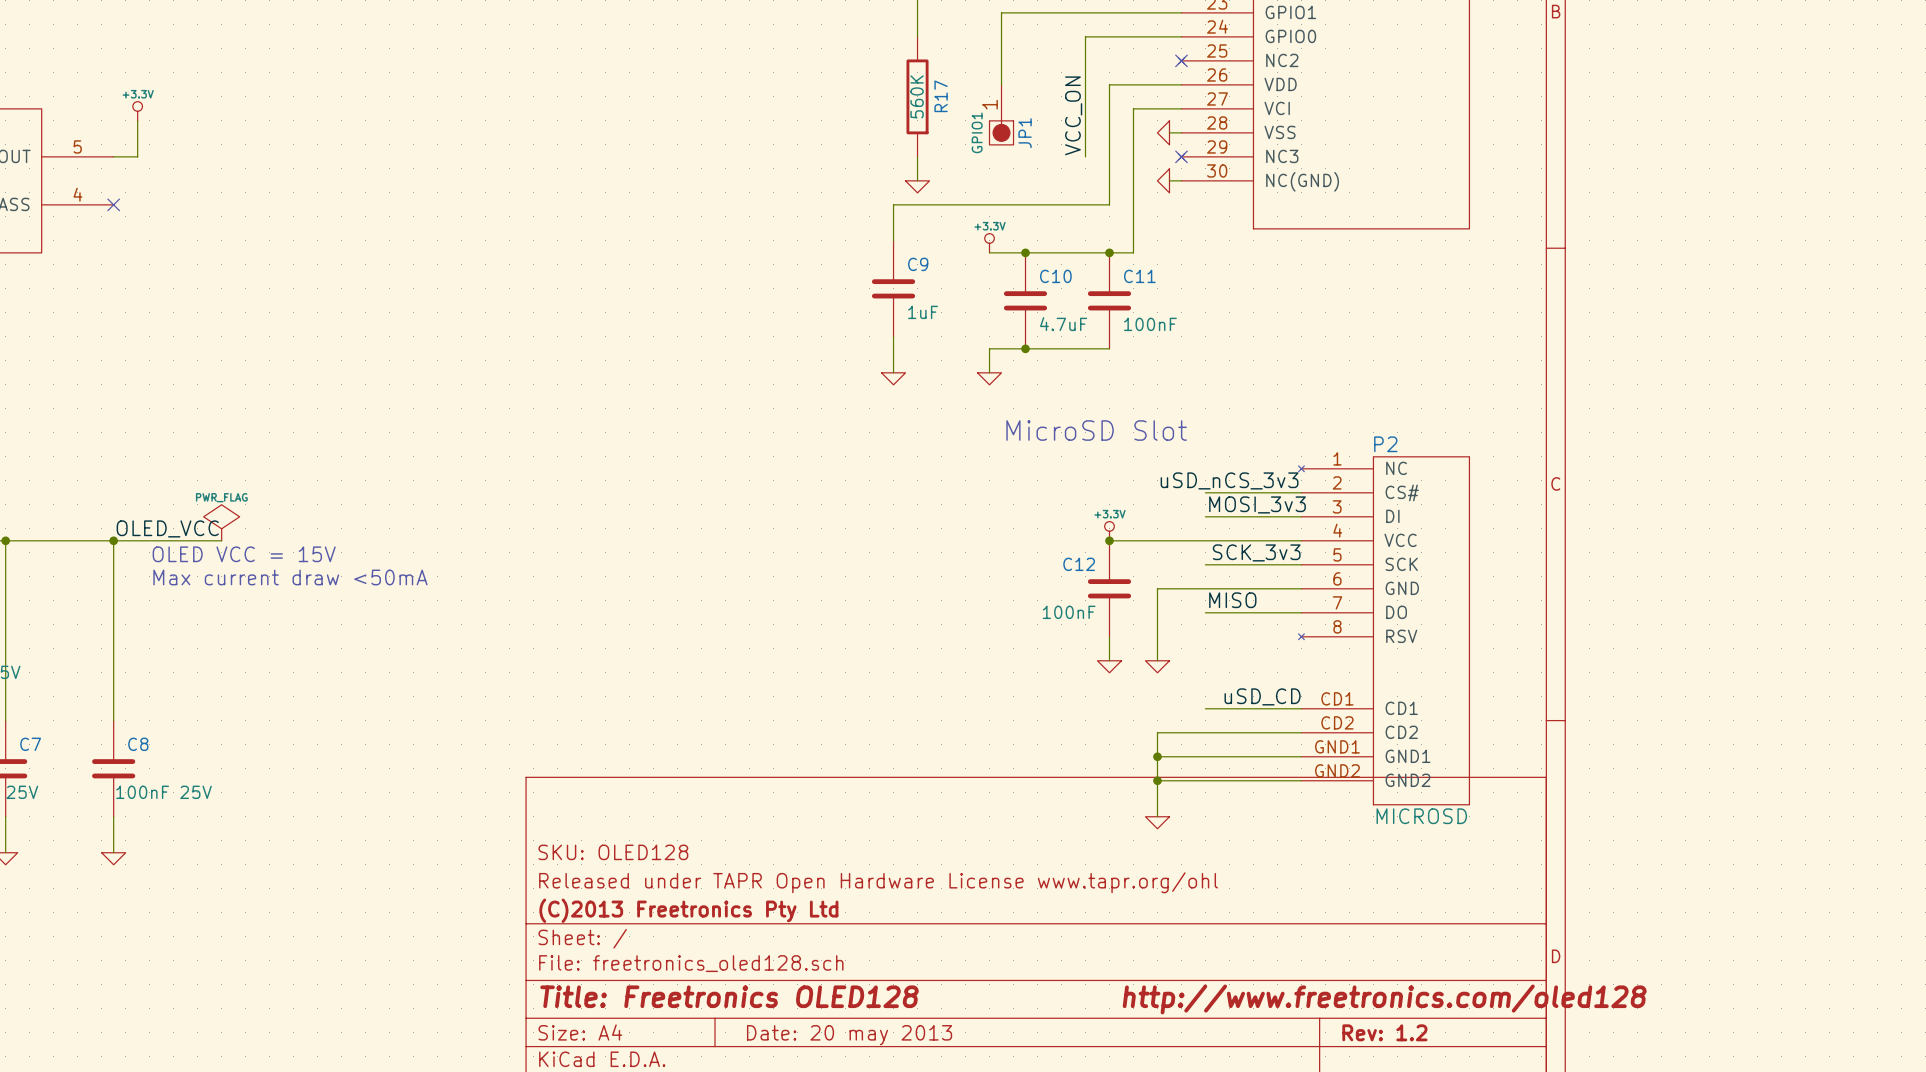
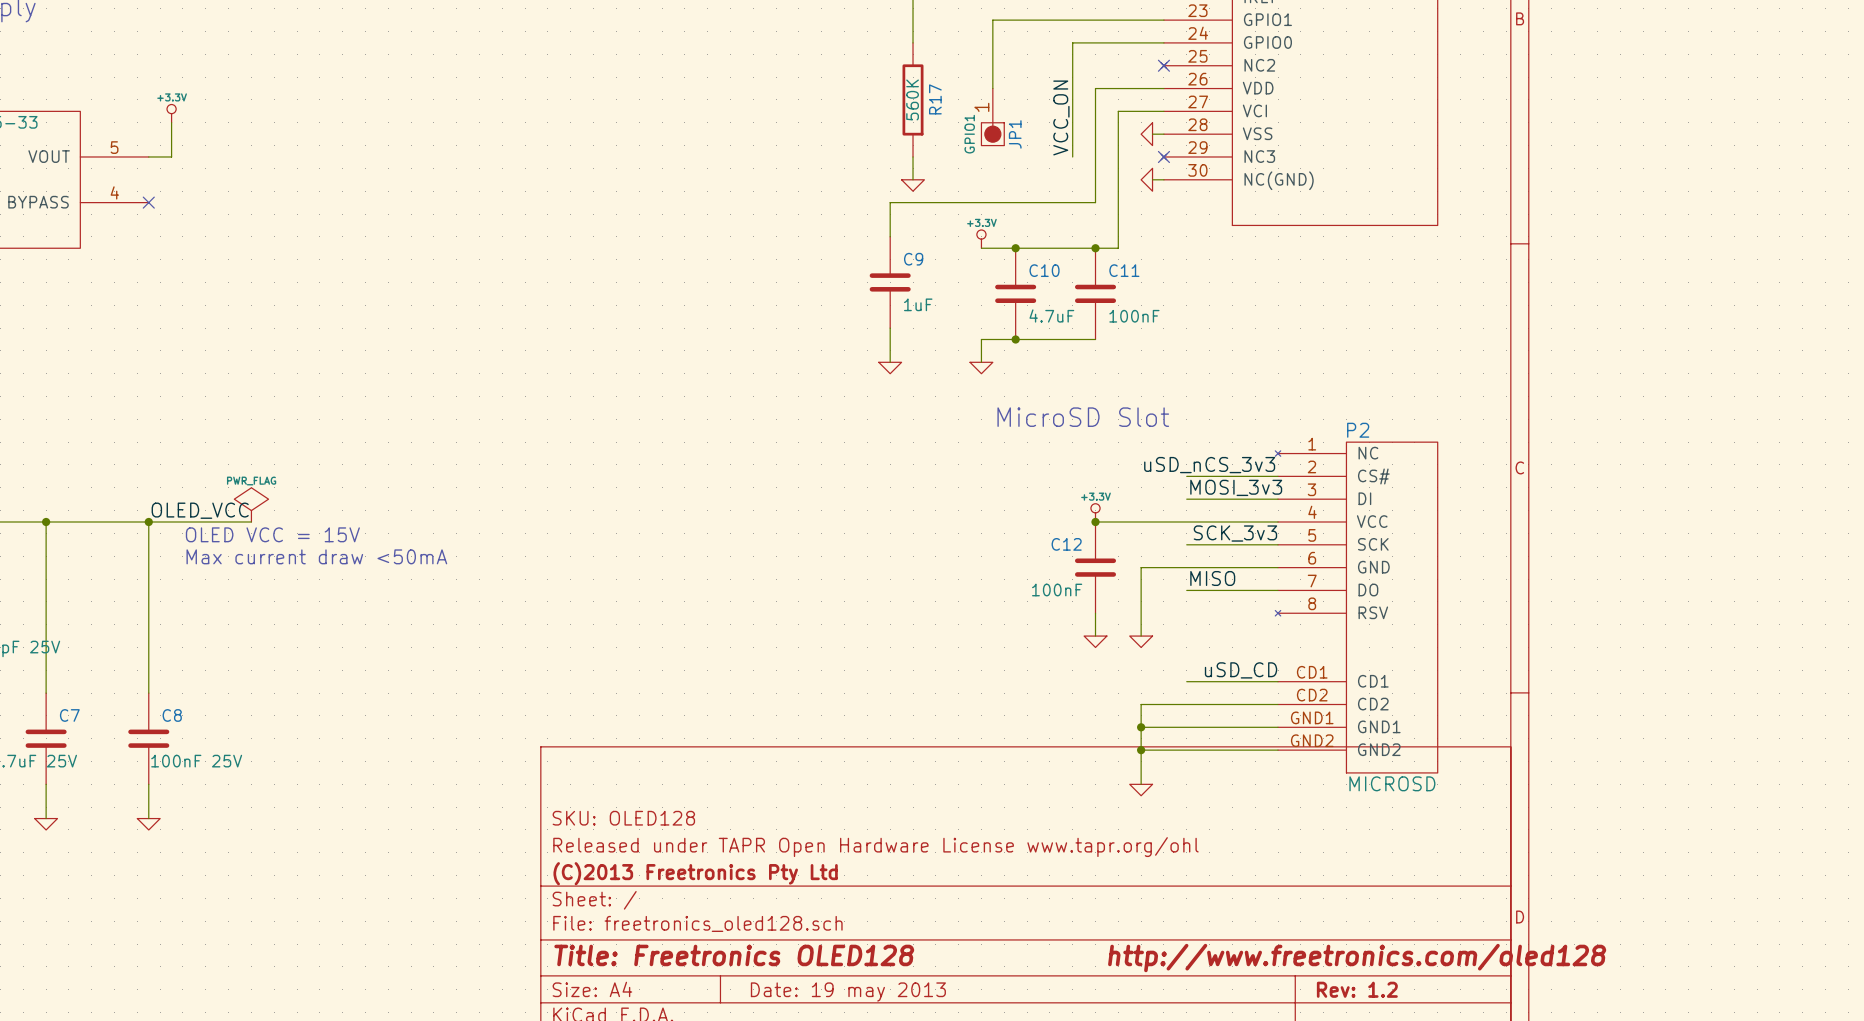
title block: Date: 20 may 2013 (849, 1035) -> Date: 19 may 2013 (848, 992)

